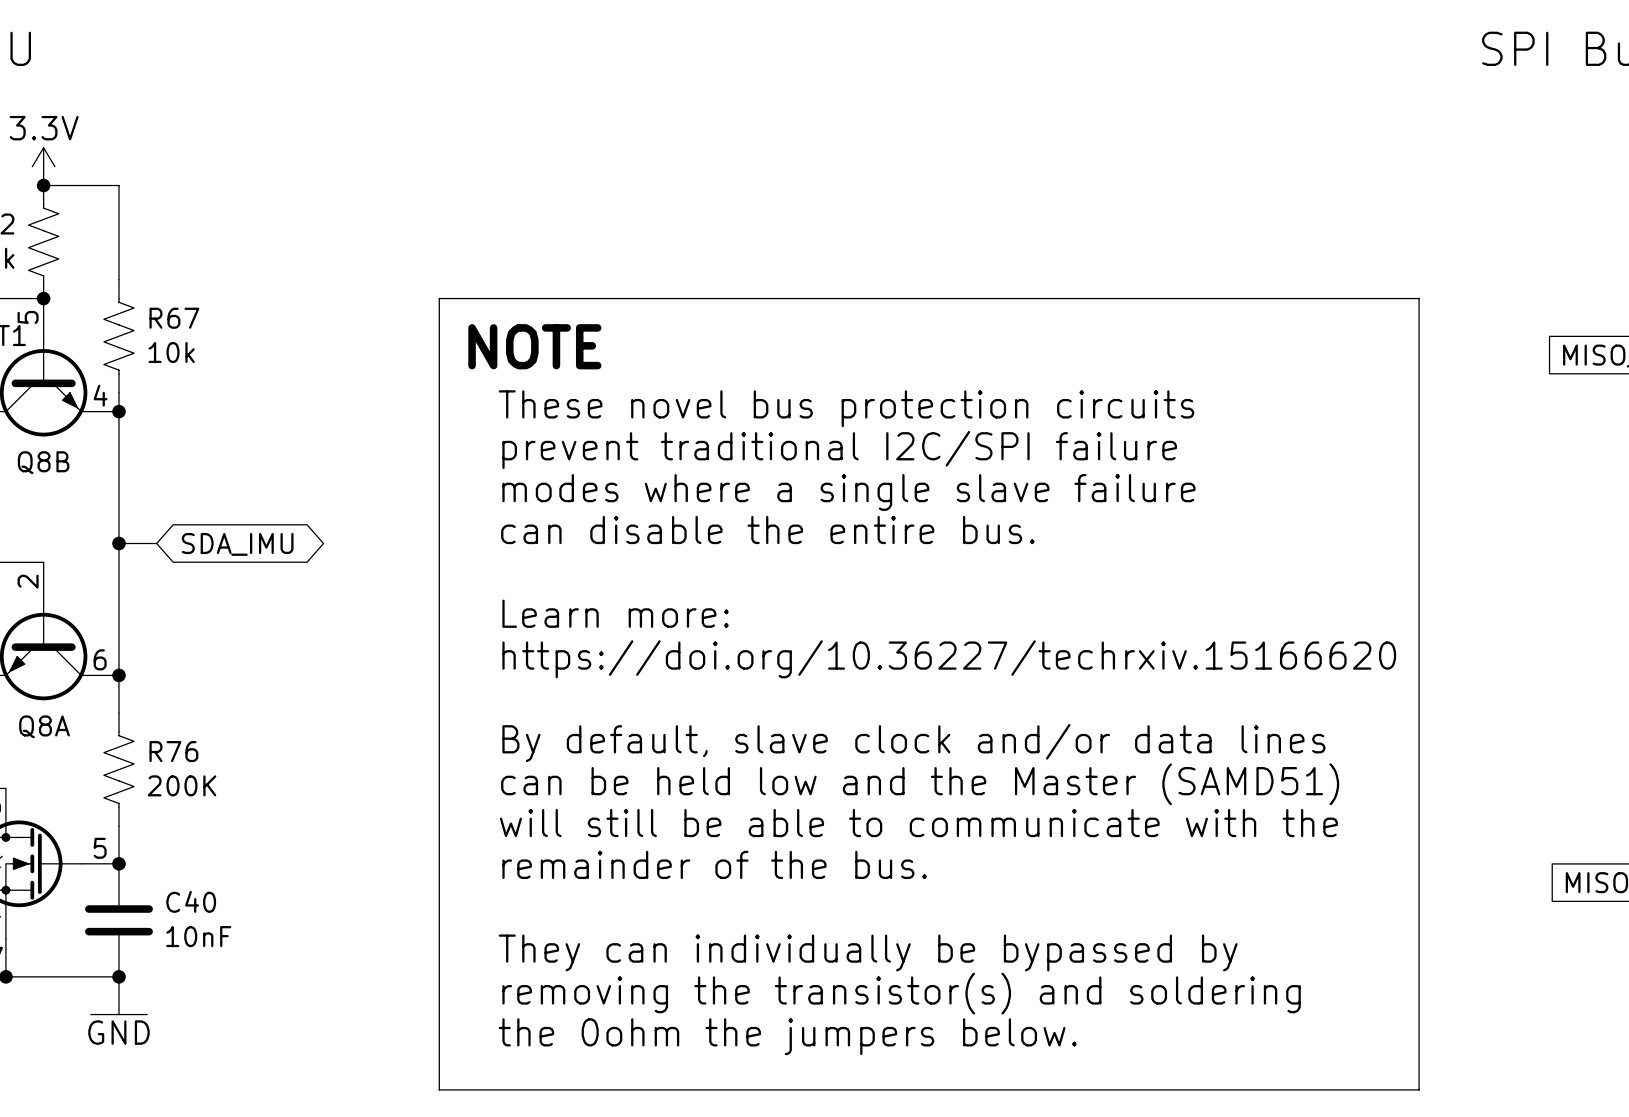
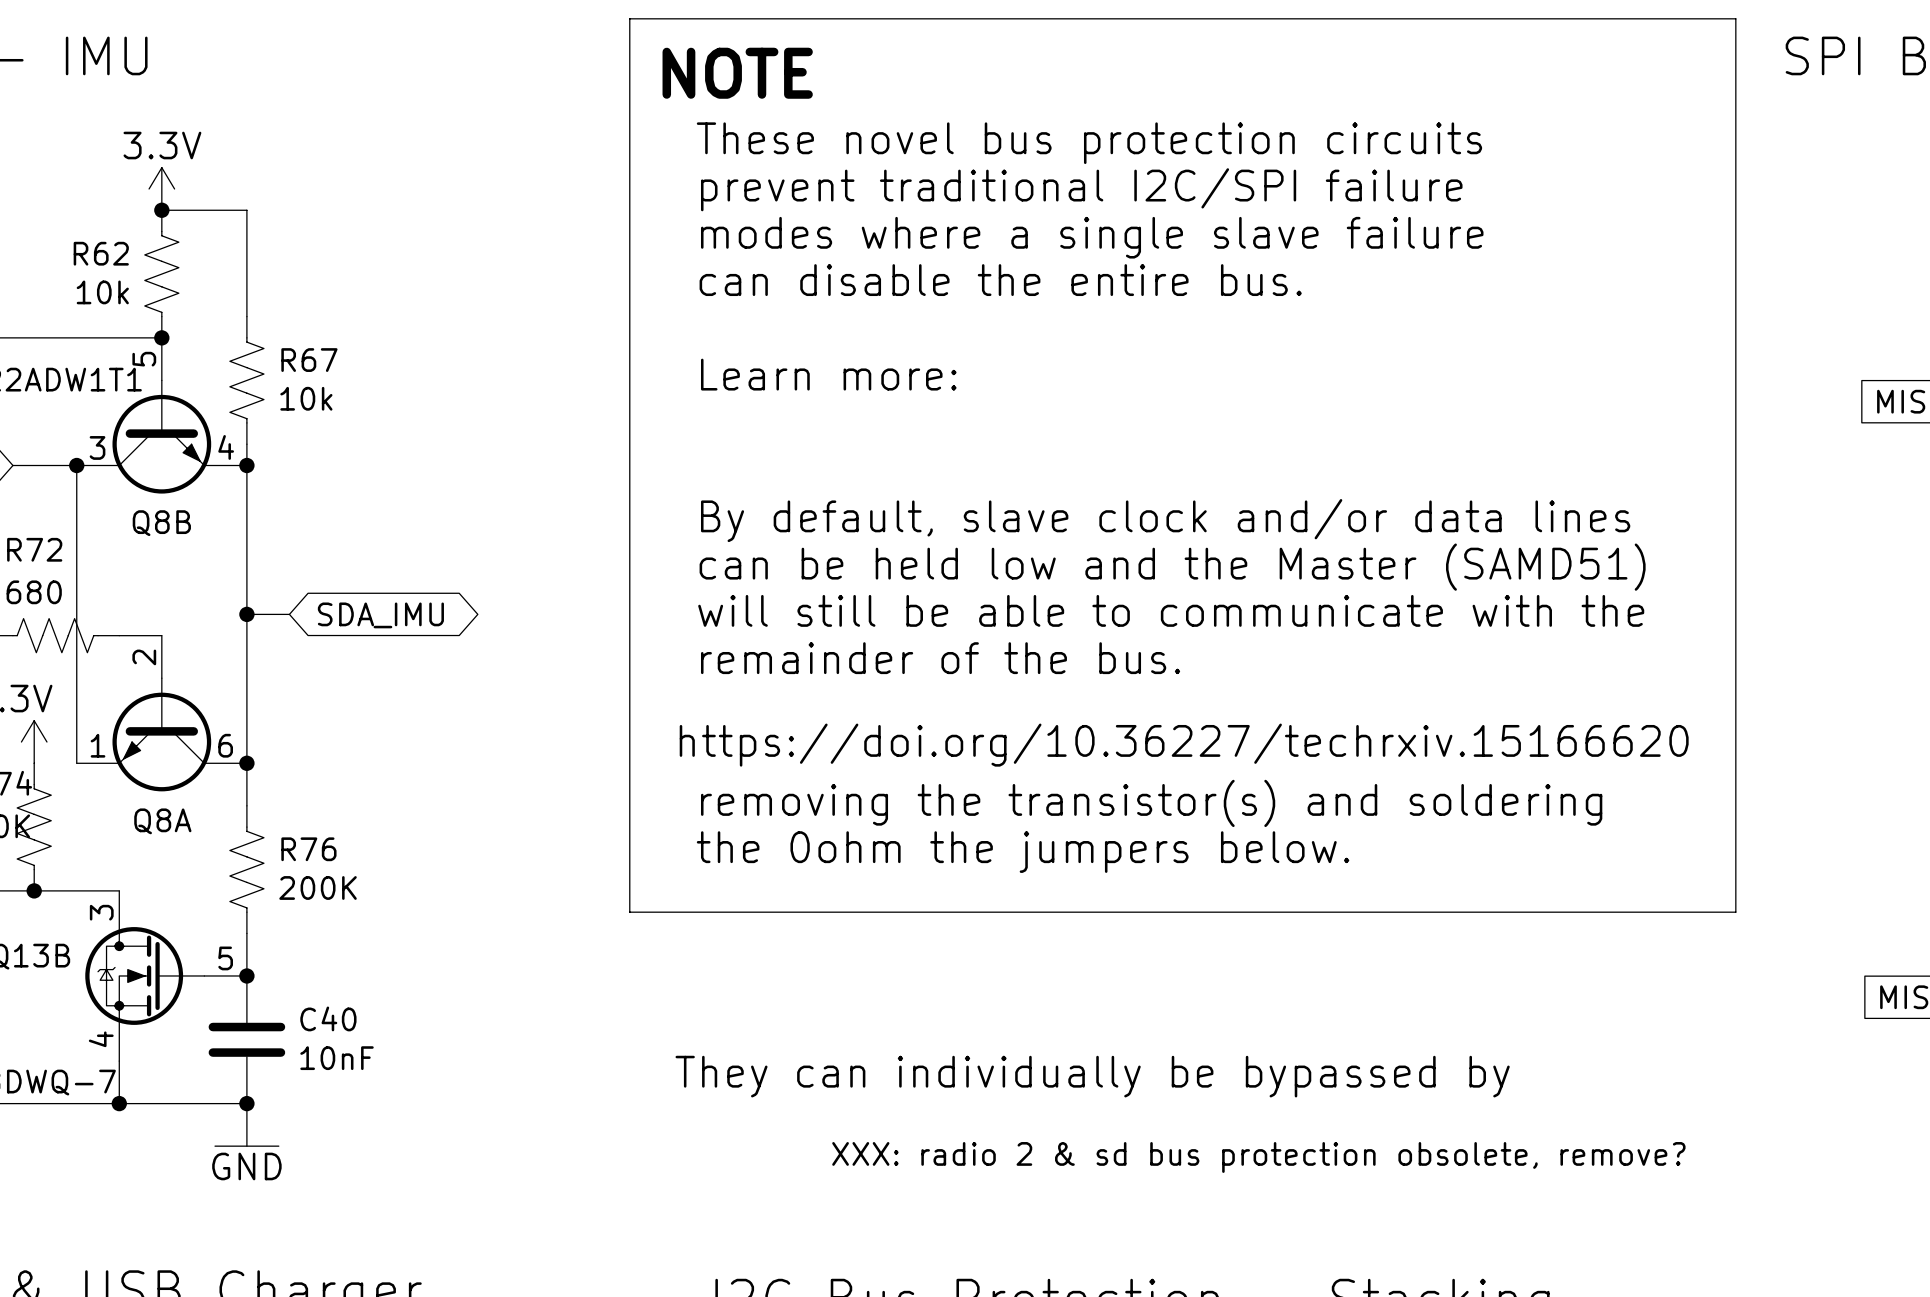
line: (439, 298) (1419, 298) (1419, 1089) (439, 1089) (439, 298) -> (629, 18) (1735, 18) (1735, 912) (629, 912) (629, 18)
text position: NOTE (534, 346) -> NOTE (737, 73)
text position: These novel bus protection circuits (846, 408) -> These novel bus protection circuits (1089, 143)
text position: prevent traditional I2C/SPI failure (839, 449) -> prevent traditional I2C/SPI failure (1081, 189)
text position: modes where a single slave failure (848, 492) -> modes where a single slave failure (1092, 237)
text position: can disable the entire bus. (767, 529) -> can disable the entire bus. (1000, 280)
text position: Learn more: (615, 613) -> Learn more: (828, 374)
text position: By default, slave clock and/or data lines (913, 743) -> By default, slave clock and/or data lines (1165, 520)
text position: can be held low and the Master (SAMD51) (920, 784) -> can be held low and the Master (SAMD51) (1172, 567)
text position: will still be able to communicate with the (918, 823) -> will still be able to communicate with the (1171, 610)
text position: remainder of the bus. (714, 864) -> remainder of the bus. (940, 658)
text position: removing the transistor(s) and soldering (901, 993) -> removing the transistor(s) and soldering (1151, 803)
text: none -> XXX: radio 2 & sd bus protection obsolete, remove? (1258, 1157)
text position: the 0ohm the jumpers below. (787, 1036) -> the 0ohm the jumpers below. (1023, 852)

